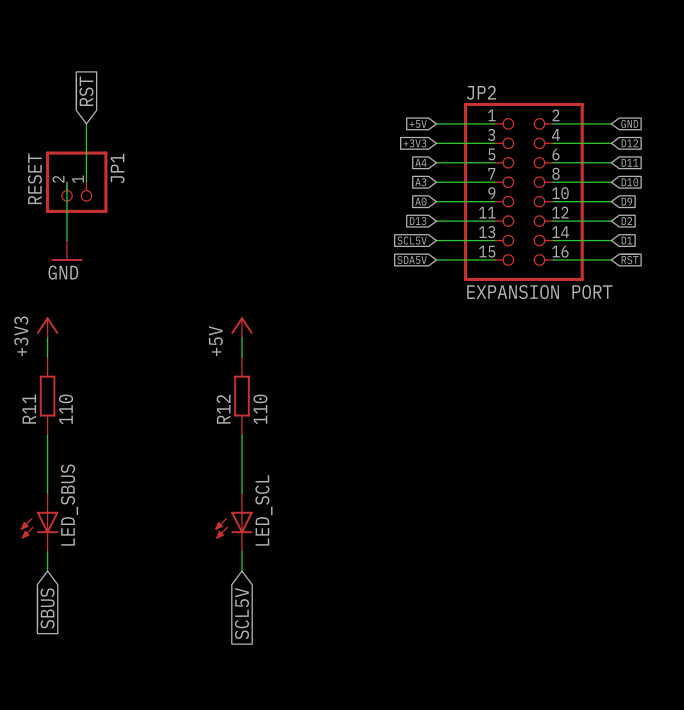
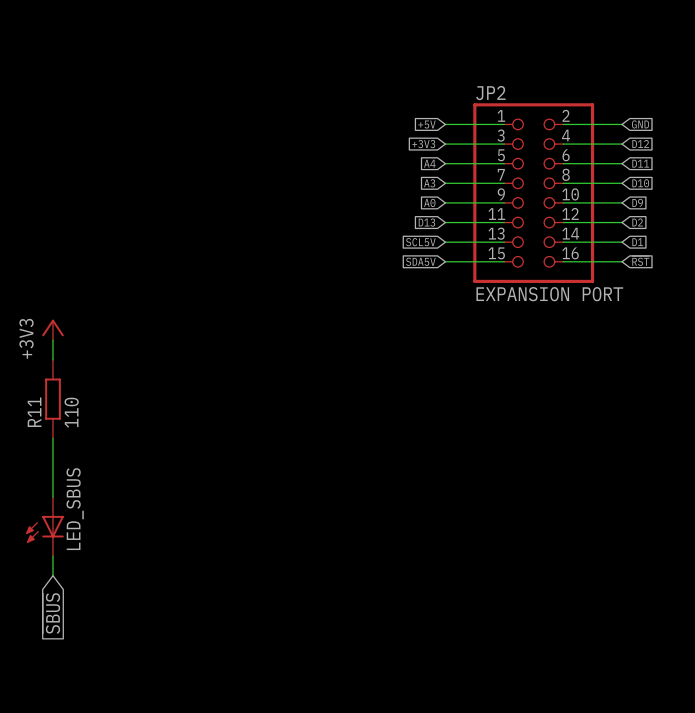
global label: ~{RST} (85, 91) -> none
wire: (86, 123) (86, 182) -> none
wire: (67, 182) (67, 240) -> none
JP1: RESET (76, 182) -> none
power symbol: GND (67, 250) -> none
power symbol: +5V (242, 327) -> none
wire: (242, 337) (242, 357) -> none
R12: 110 (242, 396) -> none
wire: (242, 434) (242, 493) -> none
LED_SCL: (233, 522) -> none
wire: (242, 551) (242, 571) -> none
global label: SCL5V (242, 613) -> none

